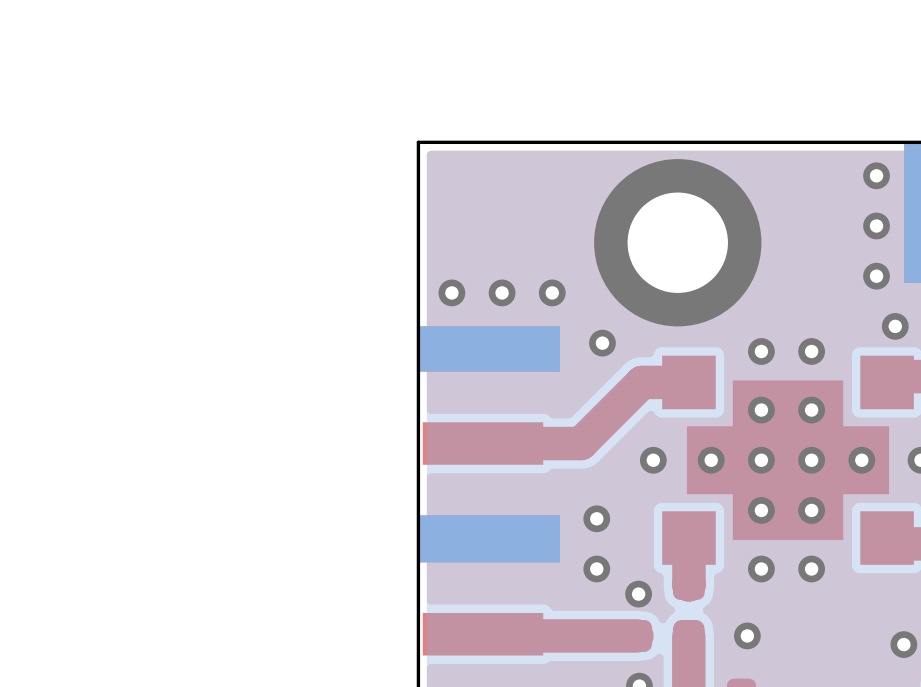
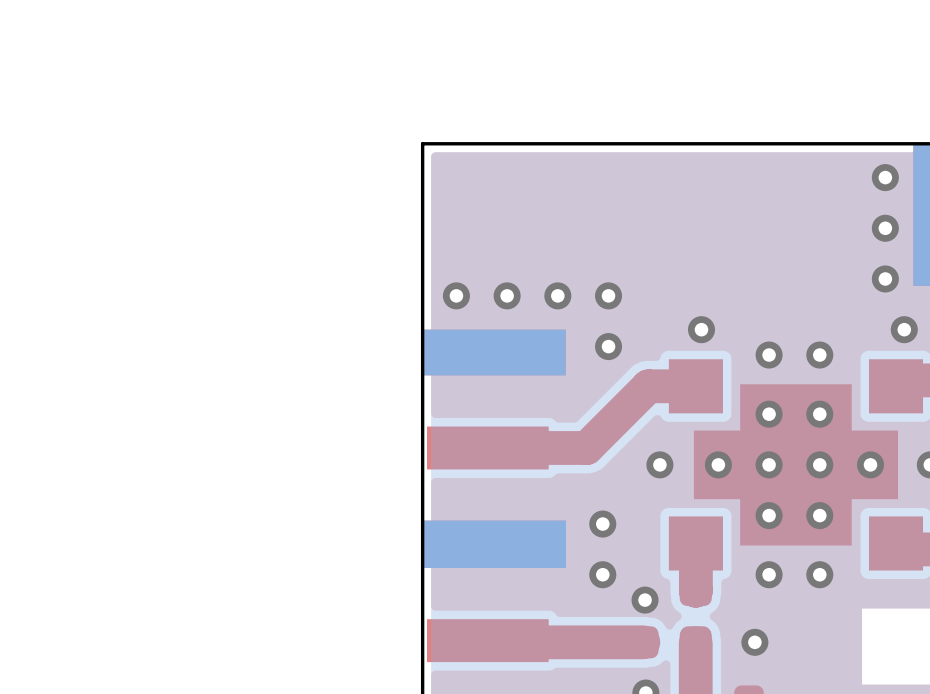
via: (677, 242) -> none
via: none -> (608, 295)
via: none -> (701, 329)
via: (903, 644) -> none

